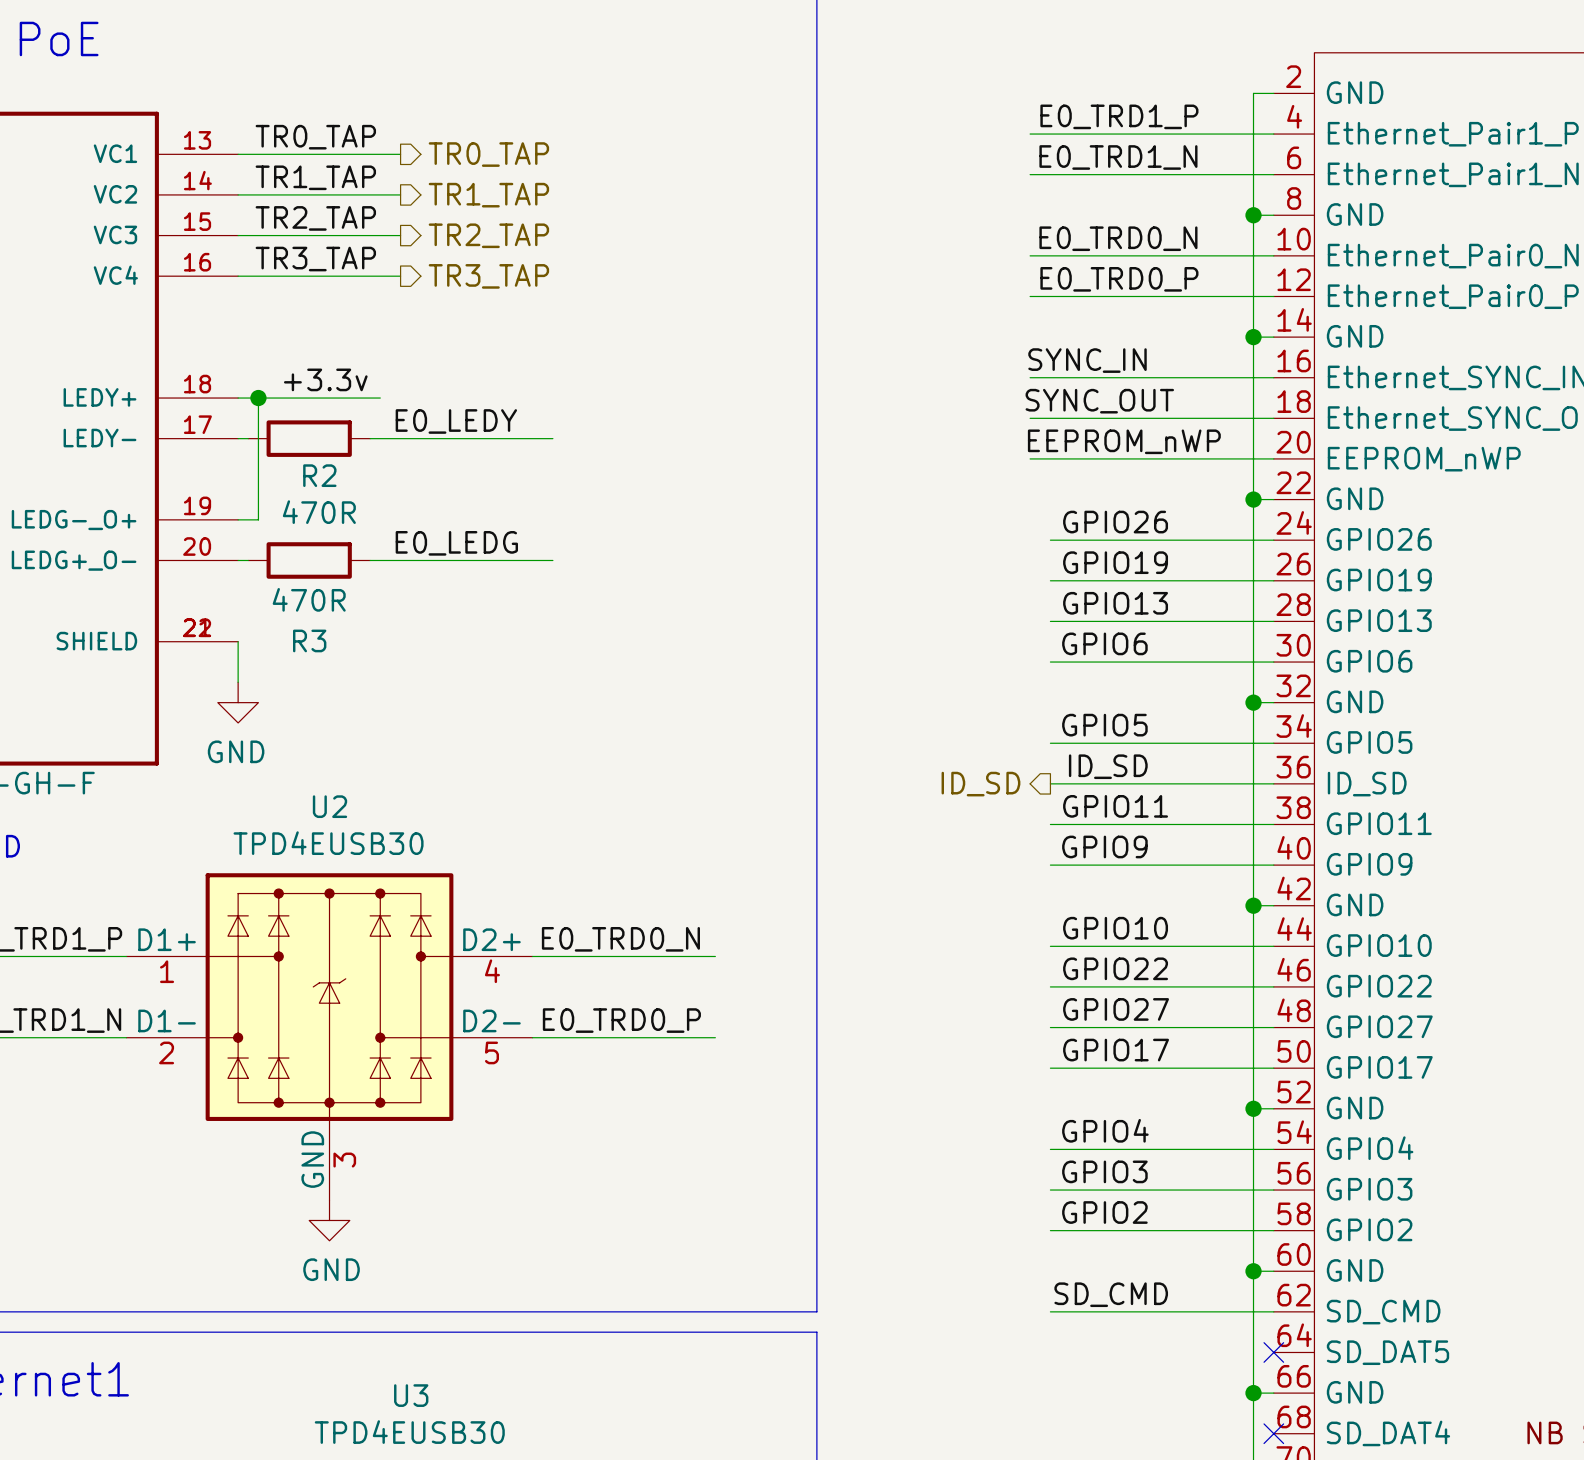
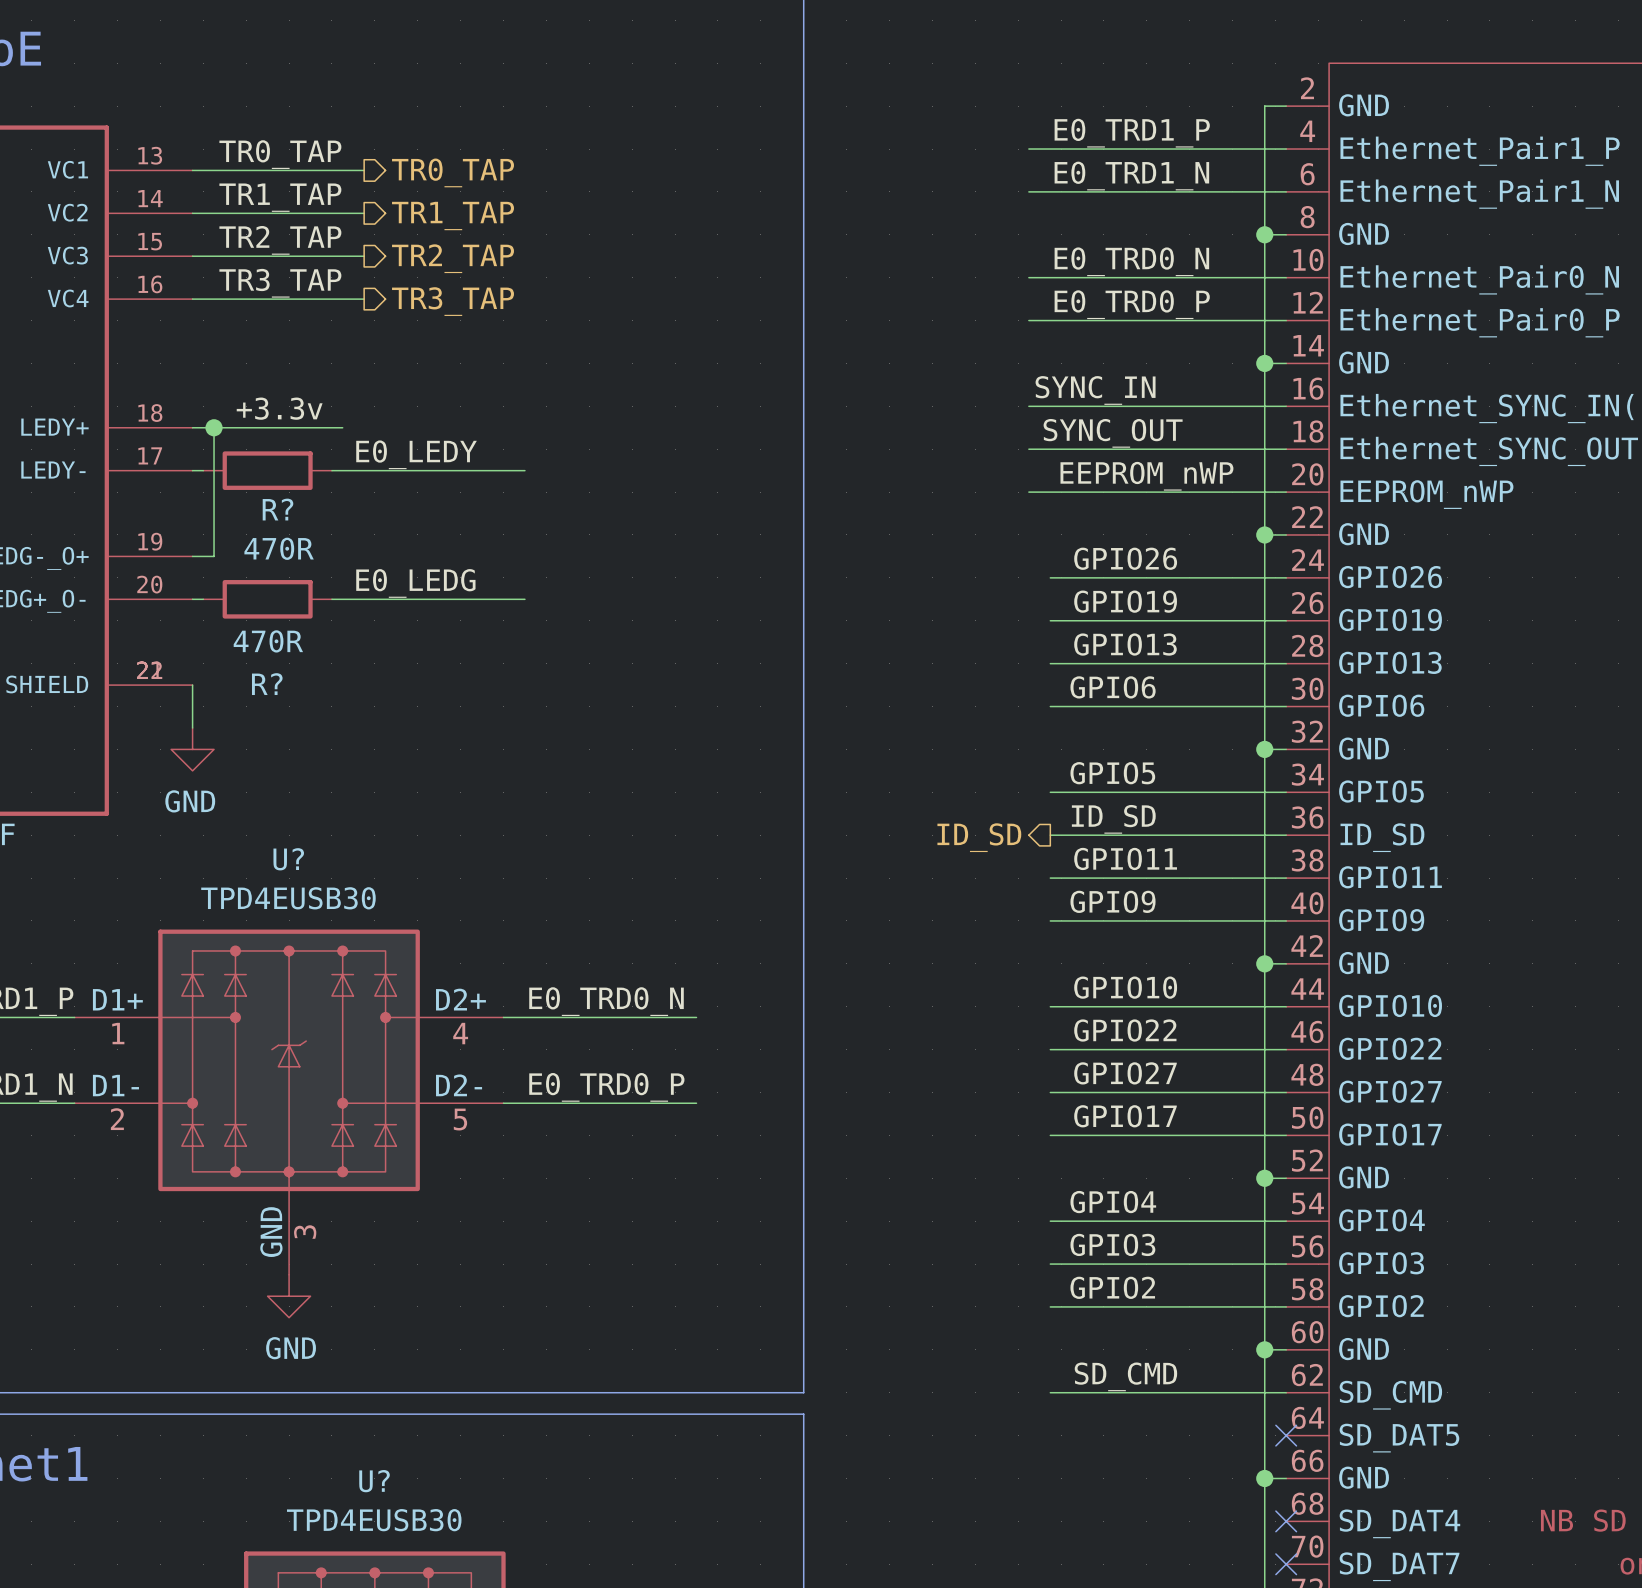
R2 name: R2 (319, 475) -> R? (277, 509)
R3 name: R3 (309, 640) -> R? (267, 684)
U2 name: U2 (329, 806) -> U? (288, 859)
U3 name: U3 (411, 1395) -> U? (374, 1481)

